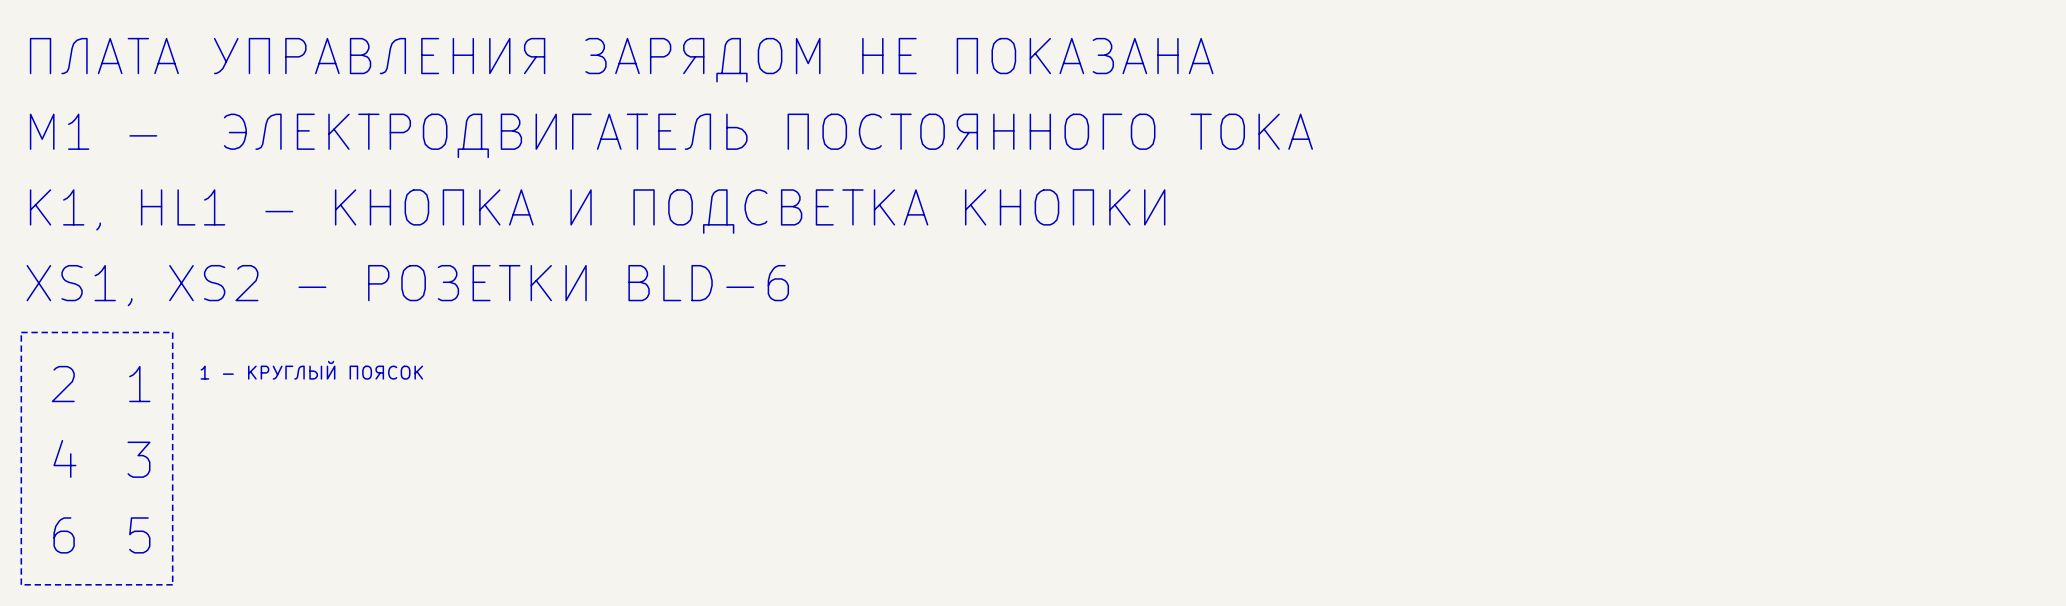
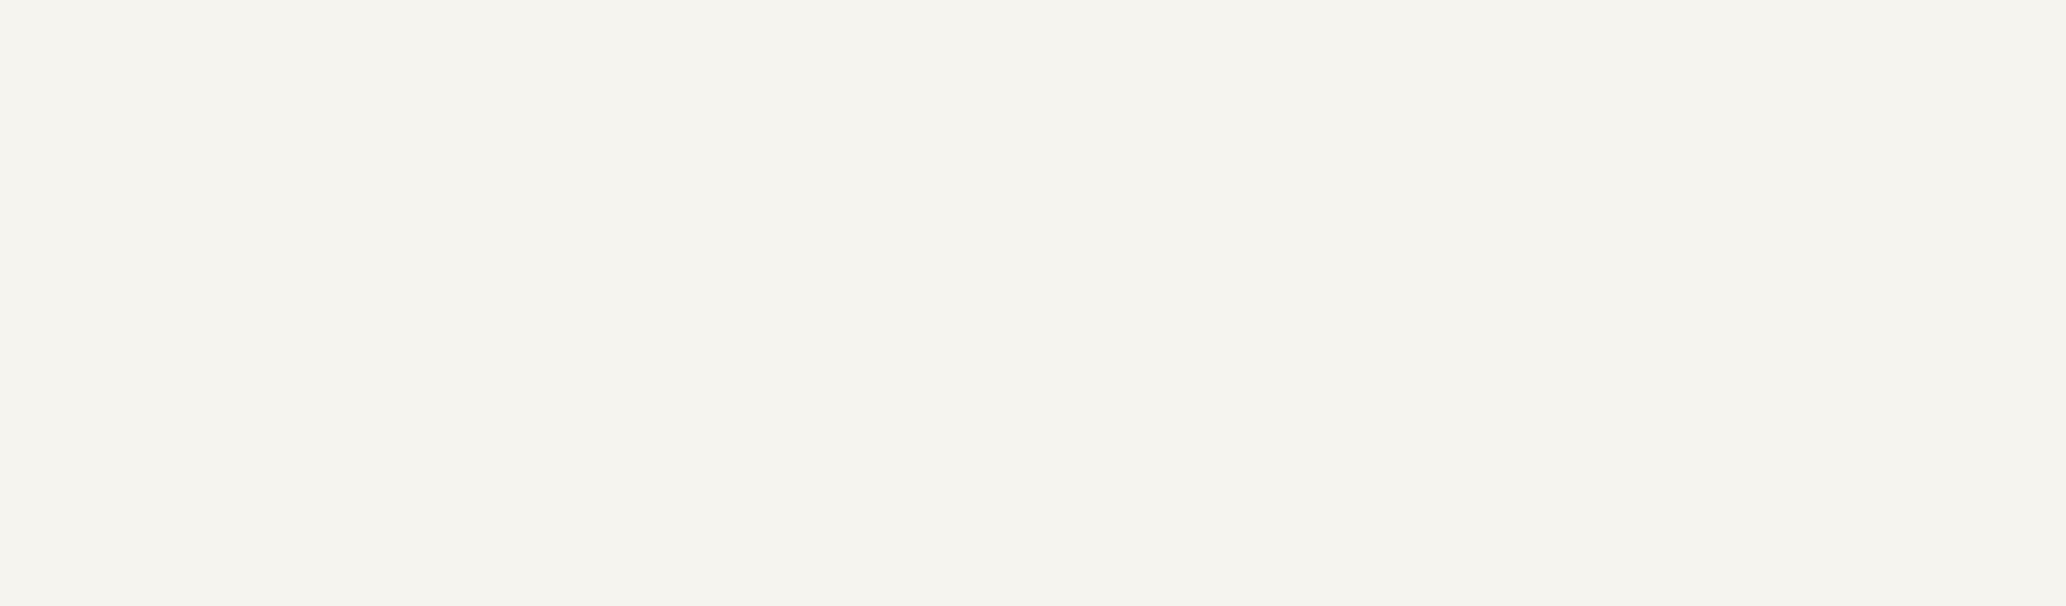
text: ПЛАТА УПРАВЛЕНИЯ ЗАРЯДОМ НЕ ПОКАЗАНА (621, 60) -> none
text: M1 - ЭЛЕКТРОДВИГАТЕЛЬ ПОСТОЯННОГО ТОКА (671, 135) -> none
text: K1, HL1 - КНОПКА И ПОДСВЕТКА КНОПКИ (597, 211) -> none
text: XS1, XS2 - РОЗЕТКИ BLD-6 (407, 285) -> none
line: (21, 332) (172, 332) (172, 584) (21, 584) (21, 332) -> none
text: 1 - КРУГЛЫЙ ПОЯСОК (311, 370) -> none
text: 2 (63, 384) -> none
text: 1 (139, 384) -> none
text: 4 (64, 458) -> none
text: 3 (138, 459) -> none
text: 6 (64, 535) -> none
text: 5 (139, 535) -> none

